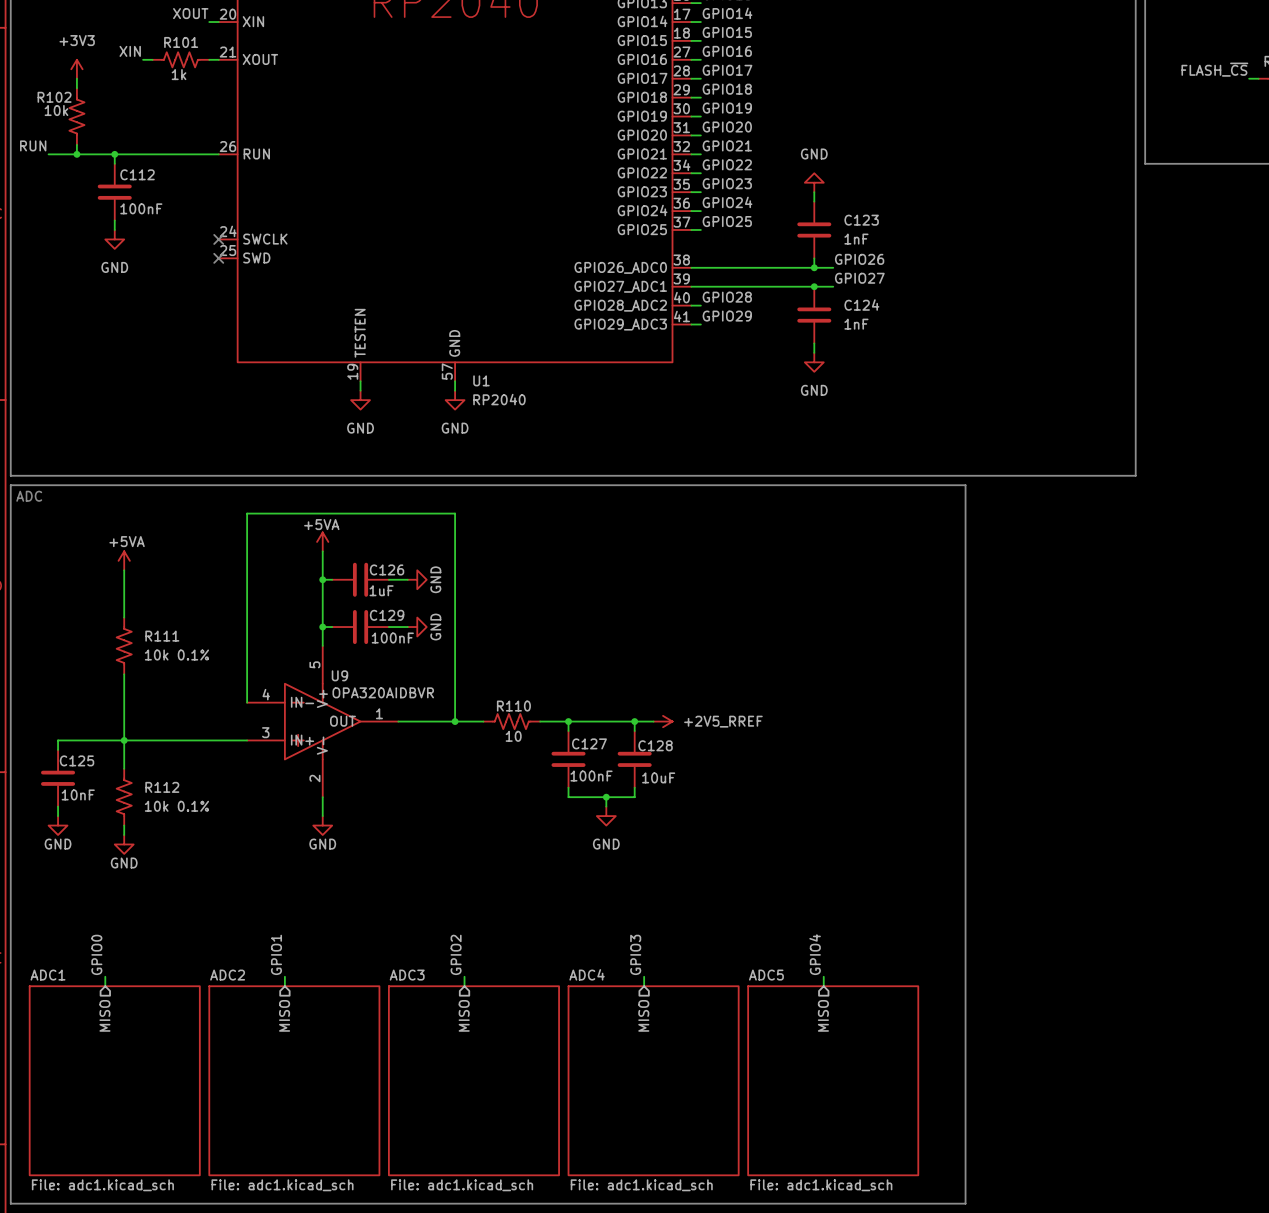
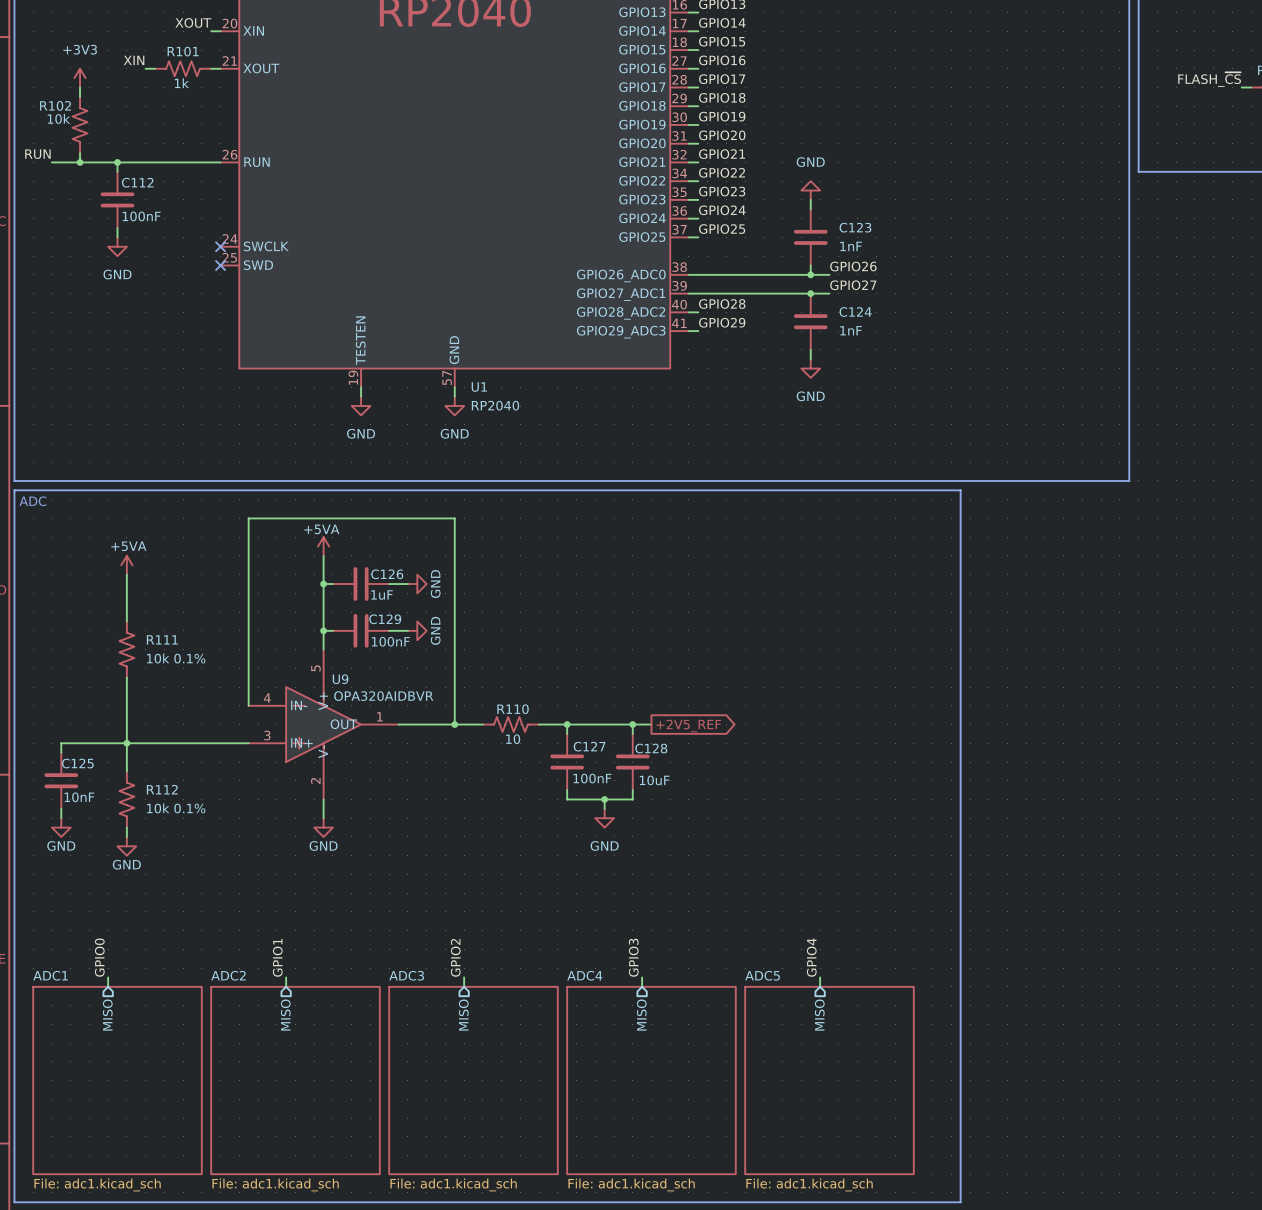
power symbol: +2V5_RREF (663, 721) -> none
global label: none -> +2V5_REF (688, 725)

